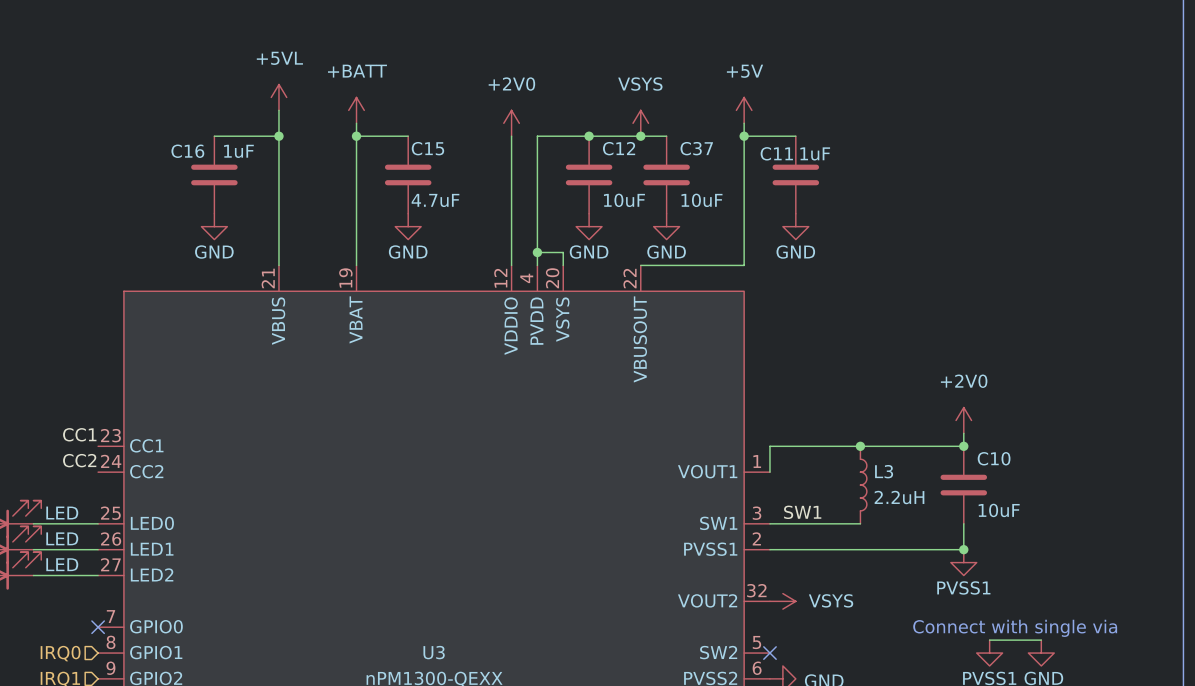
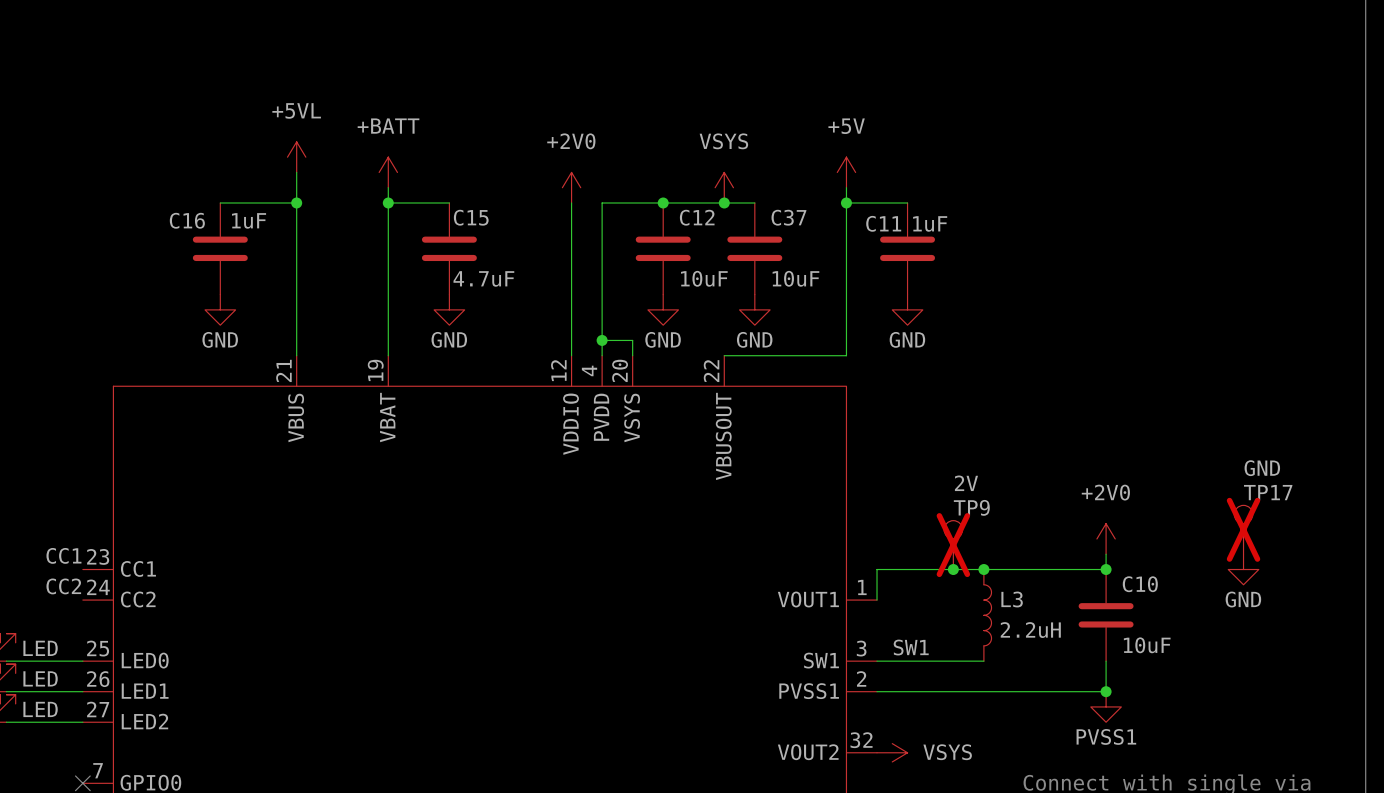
TP17: none -> GND (1243, 529)
TP9: none -> 2V (953, 545)
junction: none -> (953, 569)
power symbol: none -> GND (1243, 569)

